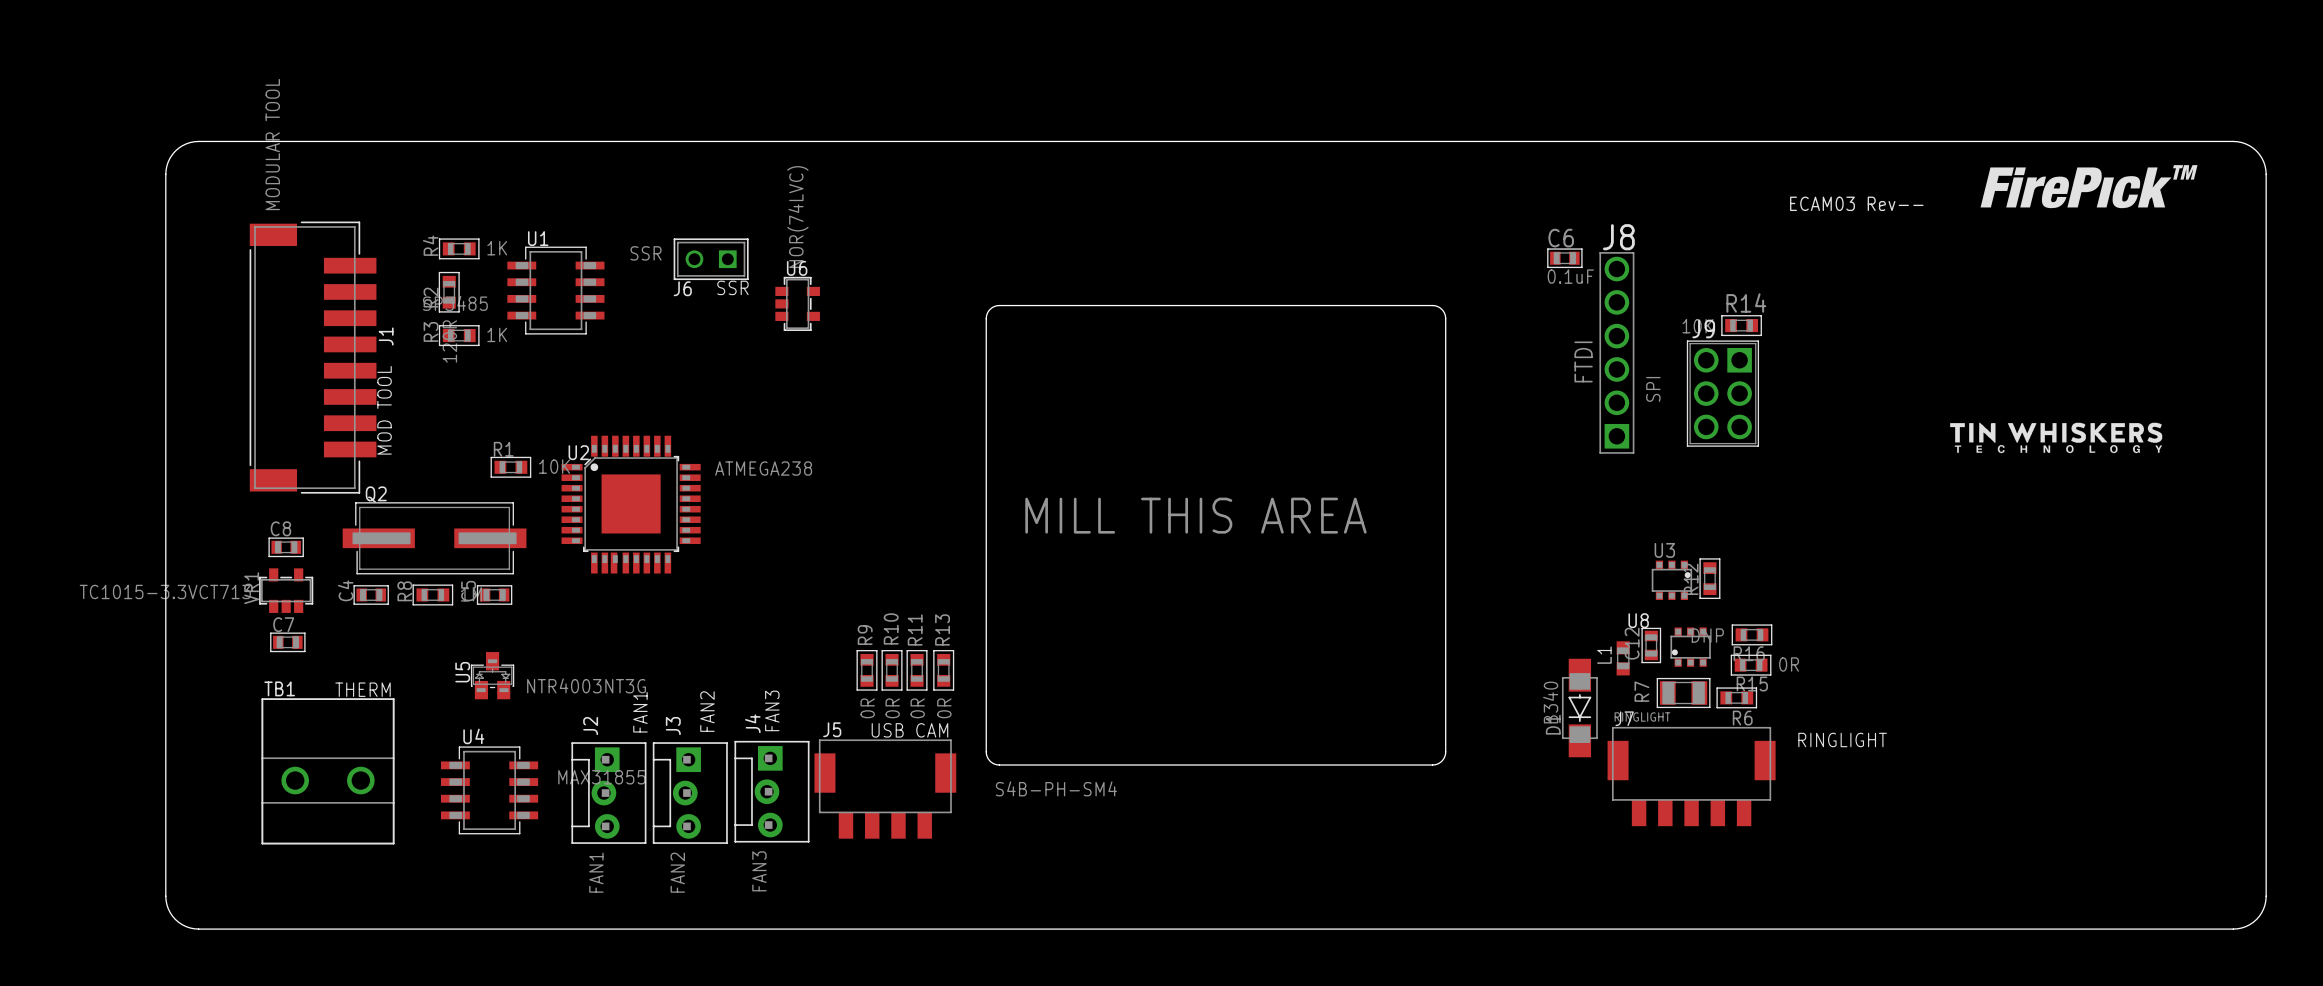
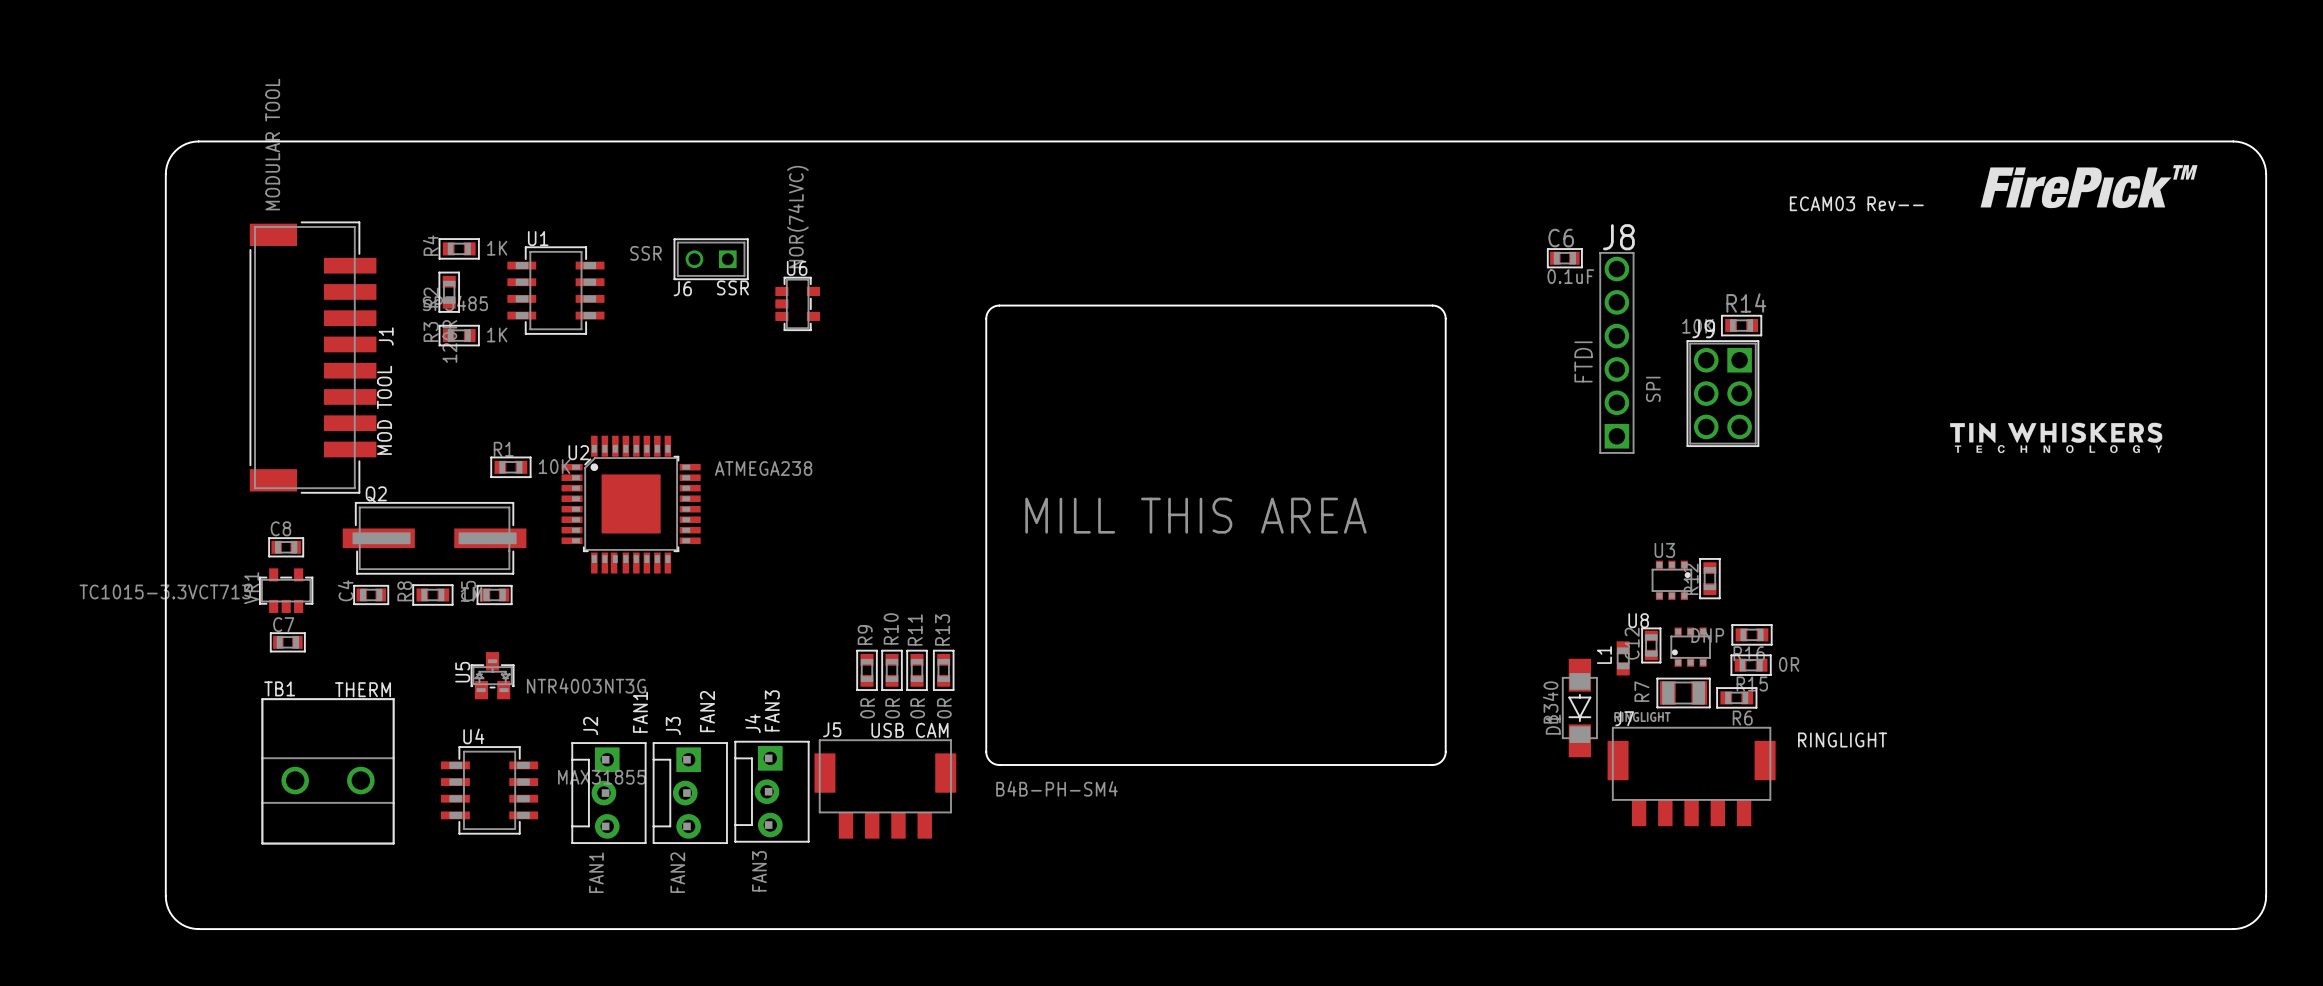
J5 value: S4B-PH-SM4 (1056, 788) -> B4B-PH-SM4 (1056, 788)

